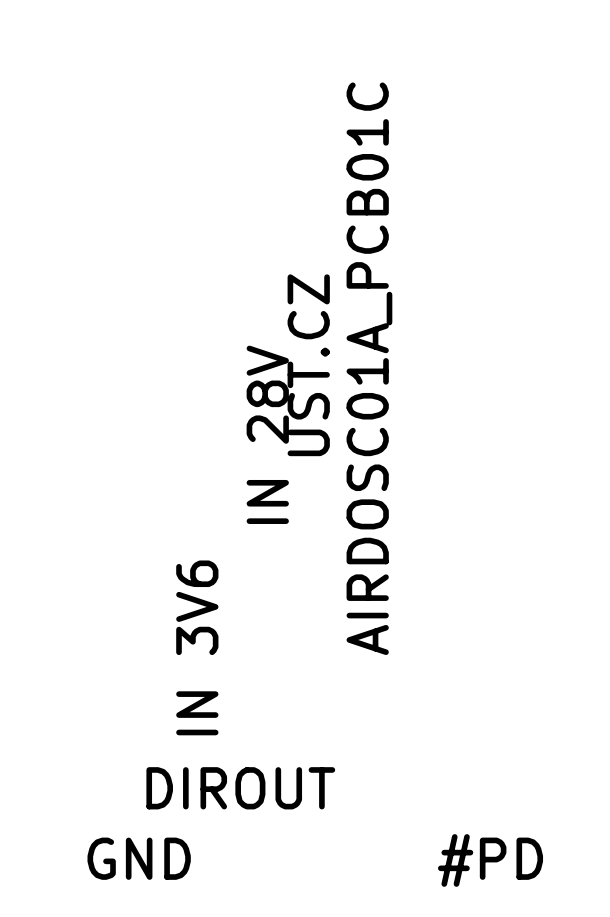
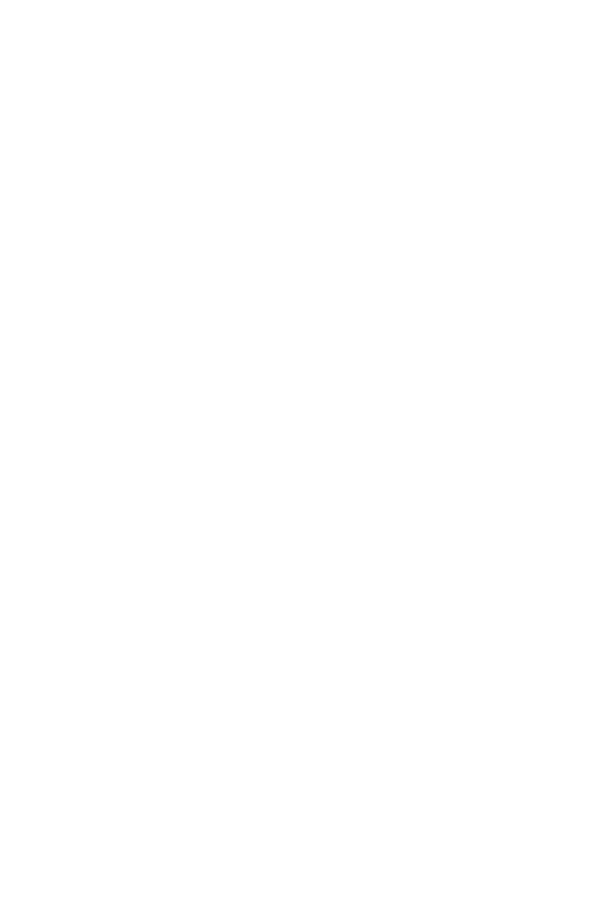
text: UST.CZ (308, 365) -> none
text: AIRDOSC01A_PCB01C (369, 368) -> none
text: IN 28V (267, 434) -> none
text: IN 3V6 (197, 647) -> none
text: DIROUT (240, 788) -> none
text: GND (139, 858) -> none
text: #PD (490, 860) -> none

